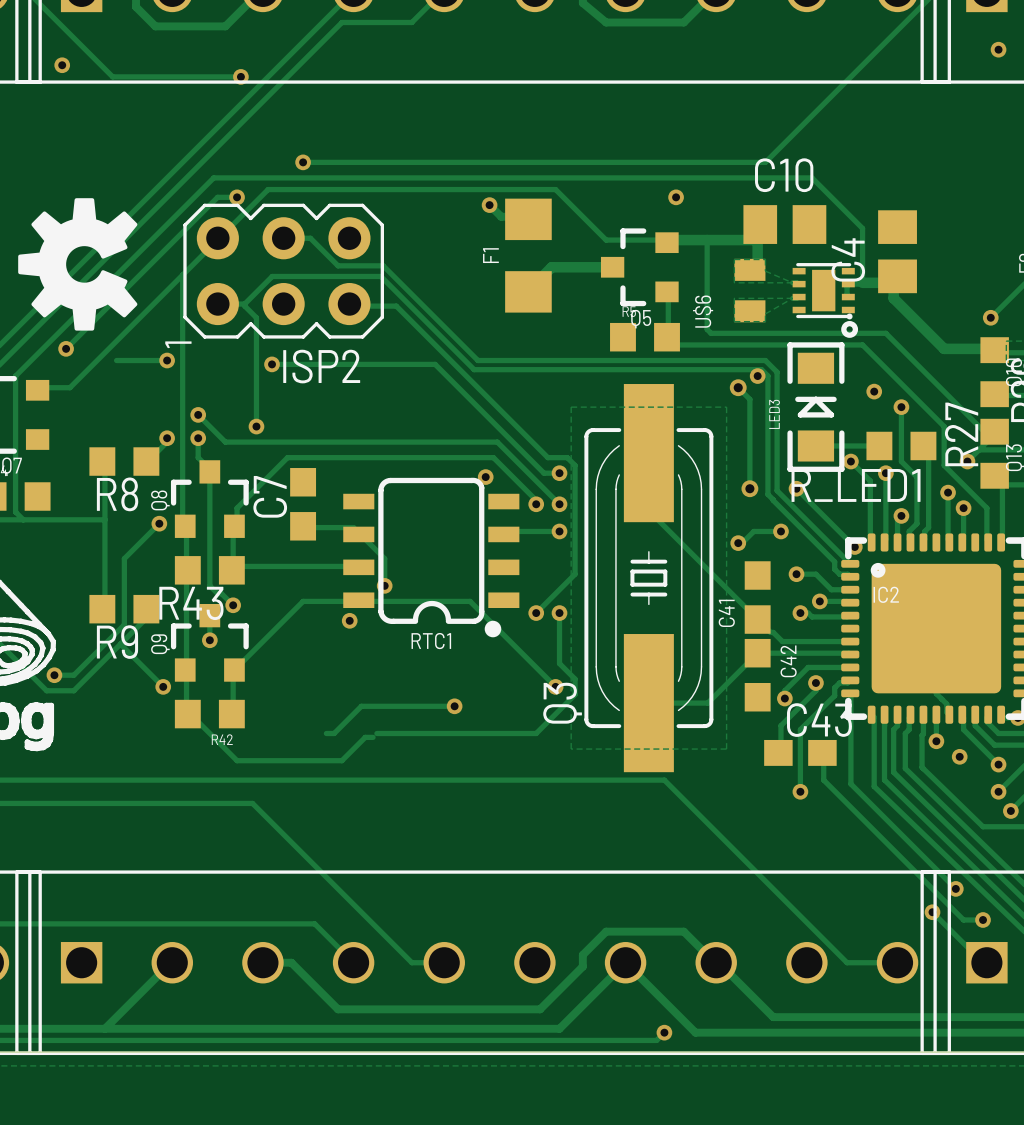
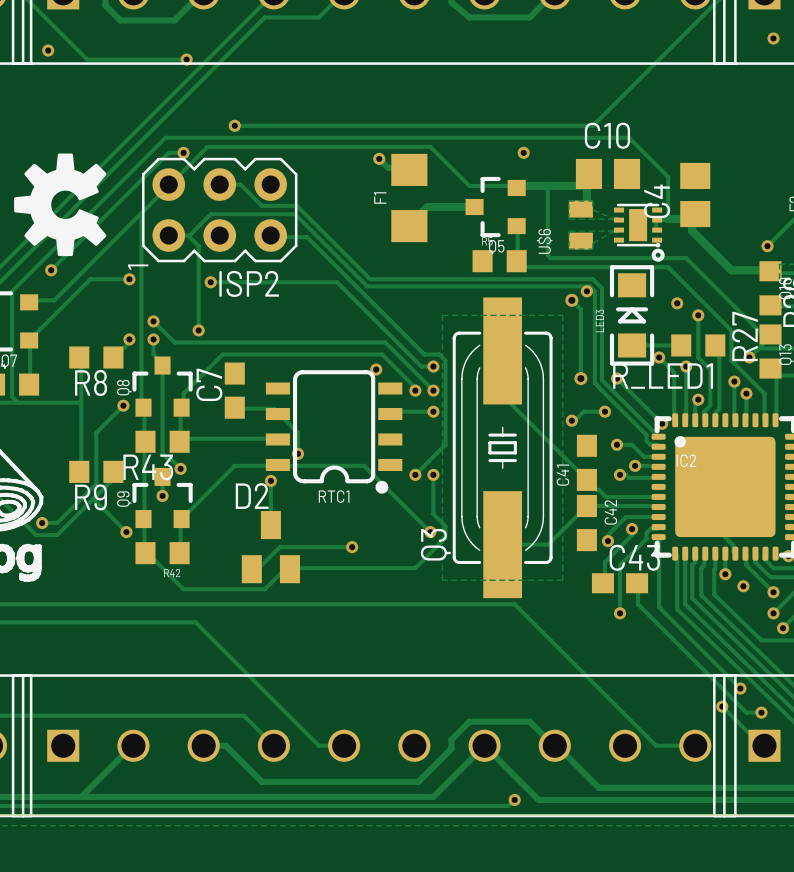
track: none -> (90, 279) (29, 340) (29, 384)
track: none -> (270, 480) (270, 525)
D2: none -> (270, 547)

